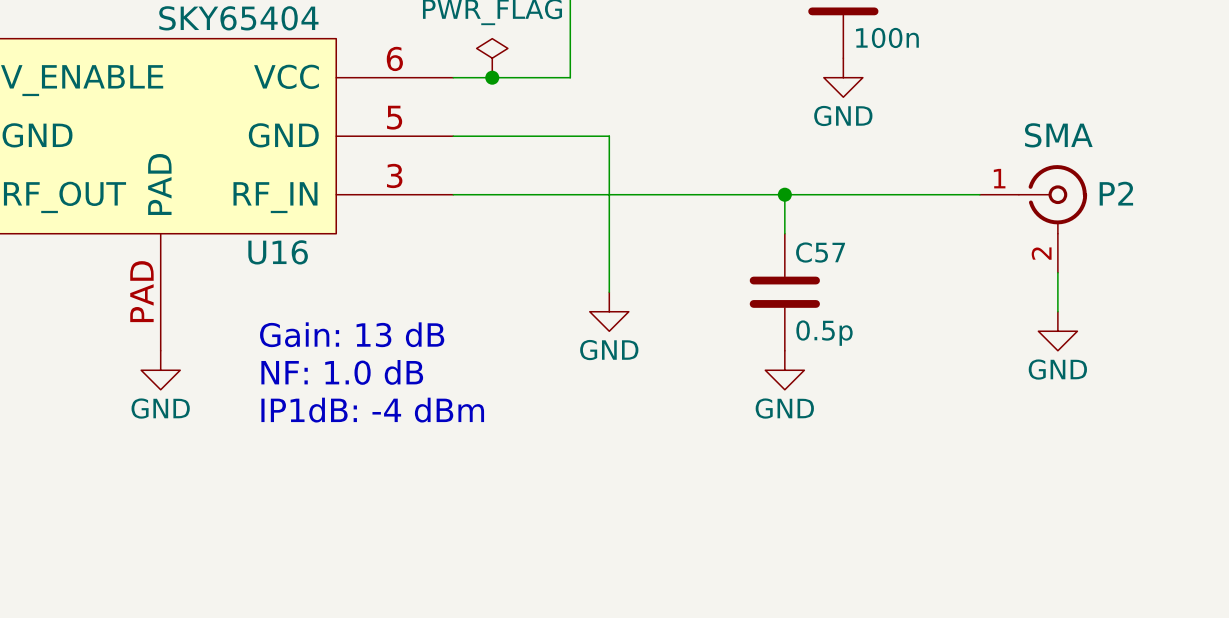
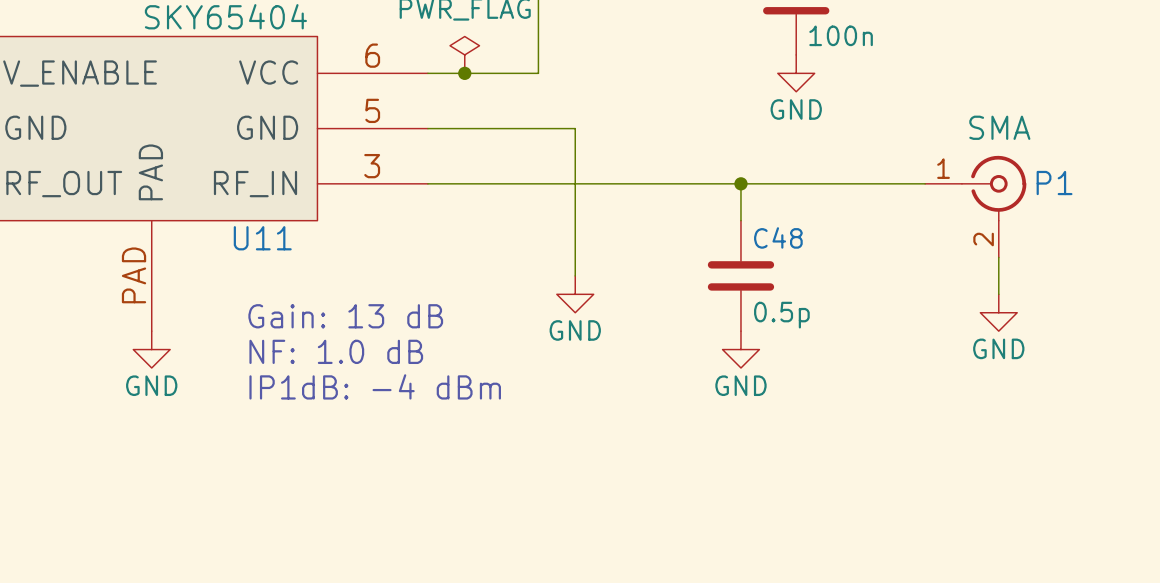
P2 name: P2 (1116, 193) -> P1 (1054, 183)
U16 name: U16 (278, 252) -> U11 (262, 238)
C57 name: C57 (820, 252) -> C48 (778, 237)

